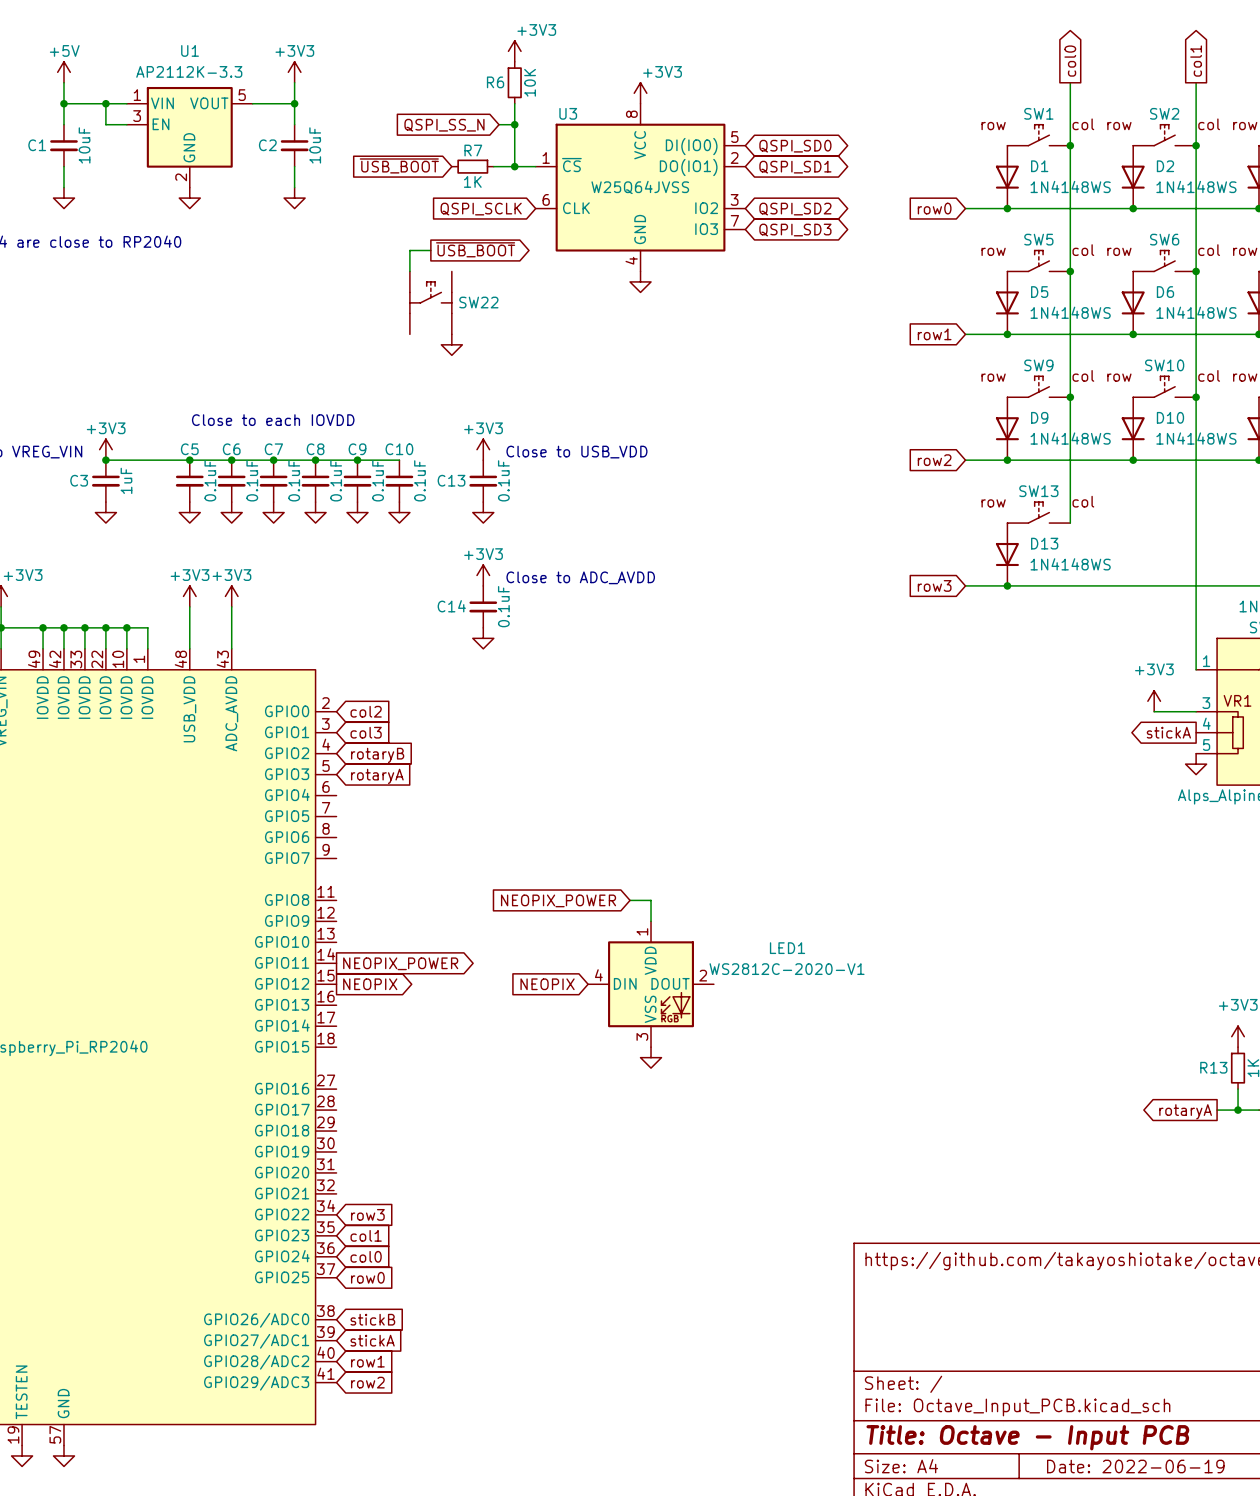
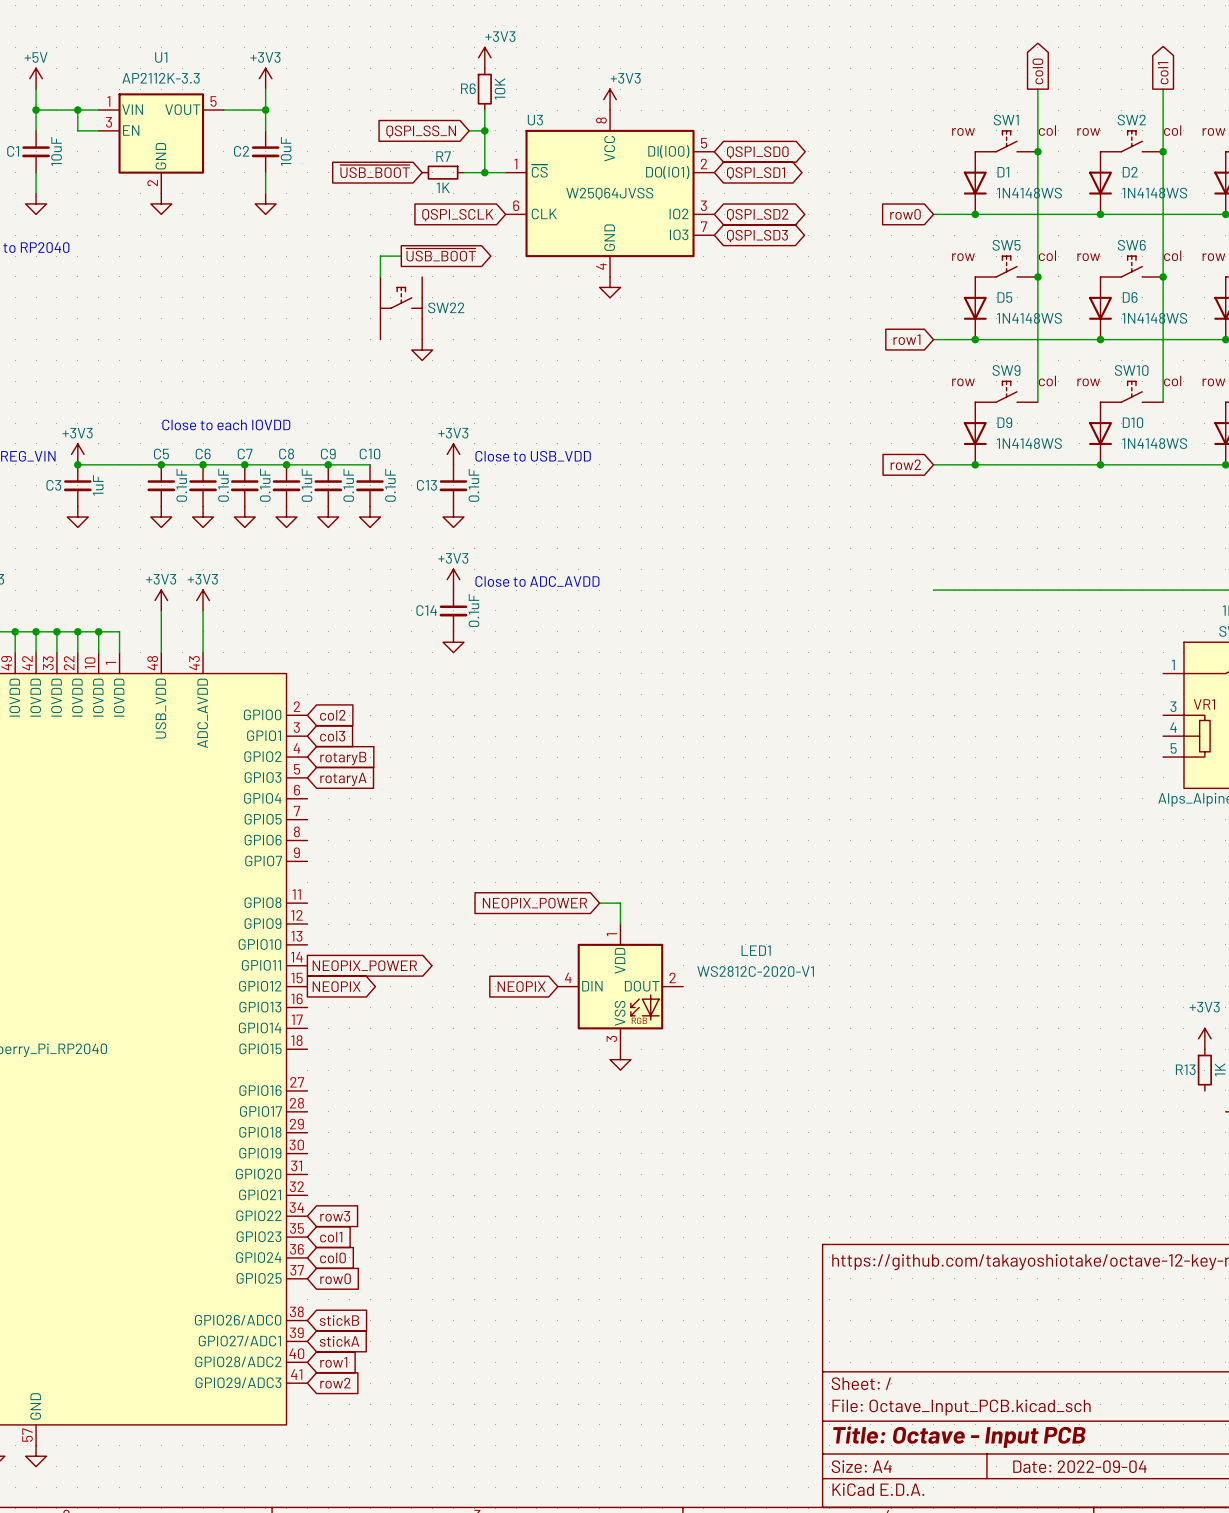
wire: (1070, 397) (1070, 523) -> none
junction: (1070, 397) -> none
wire: (1196, 397) (1196, 669) -> none
junction: (1196, 397) -> none
SW13: (1038, 512) -> none
D13: 1N4148WS (1007, 554) -> none
global label: row3 (934, 585) -> none
junction: (1007, 585) -> none
power symbol: +3V3 (1154, 701) -> none
wire: (1154, 711) (1196, 711) -> none
global label: stickA (1168, 732) -> none
power symbol: (1196, 764) -> none
wire: (1238, 1089) (1238, 1110) -> none
wire: (1217, 1110) (1258, 1110) -> none
junction: (1238, 1110) -> none
global label: rotaryA (1185, 1111) -> none
title block: Date: 2022-06-19 (1135, 1466) -> Date: 2022-09-04 (1079, 1466)

